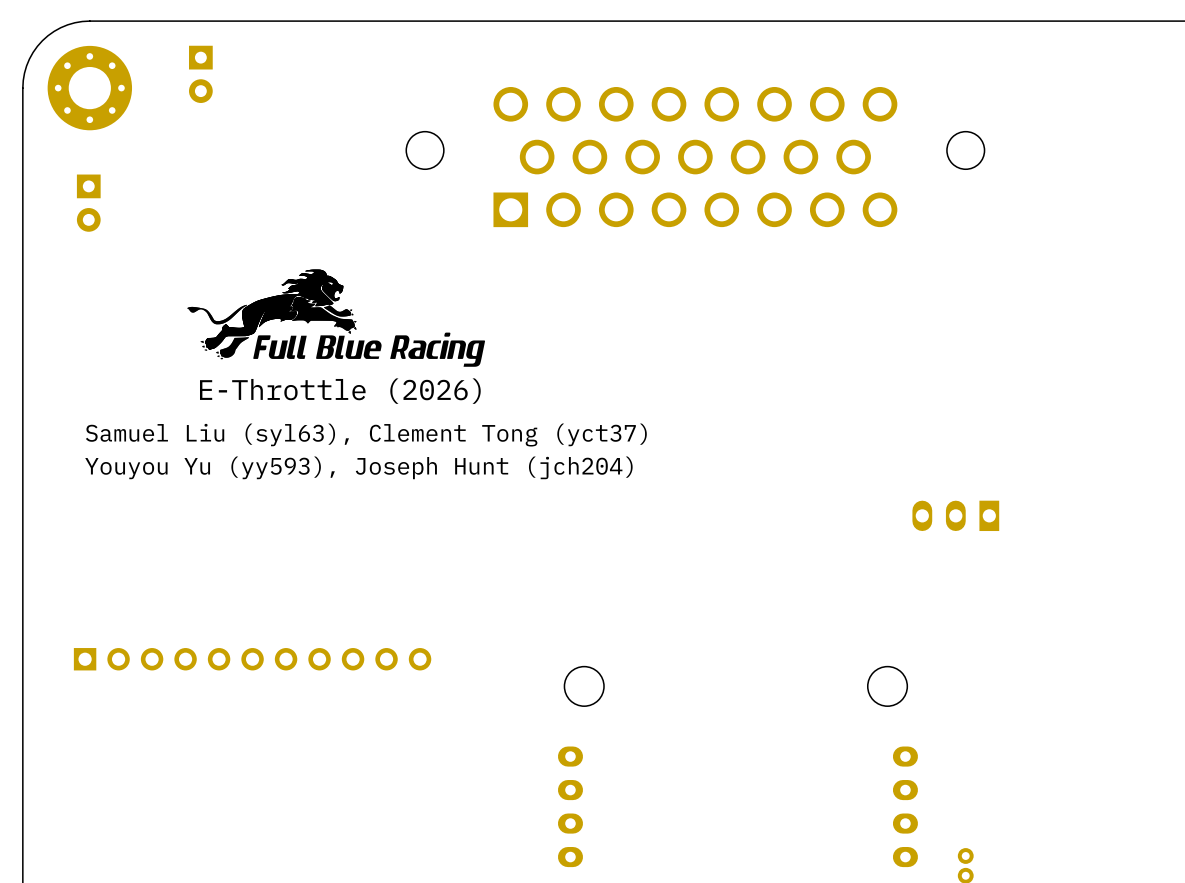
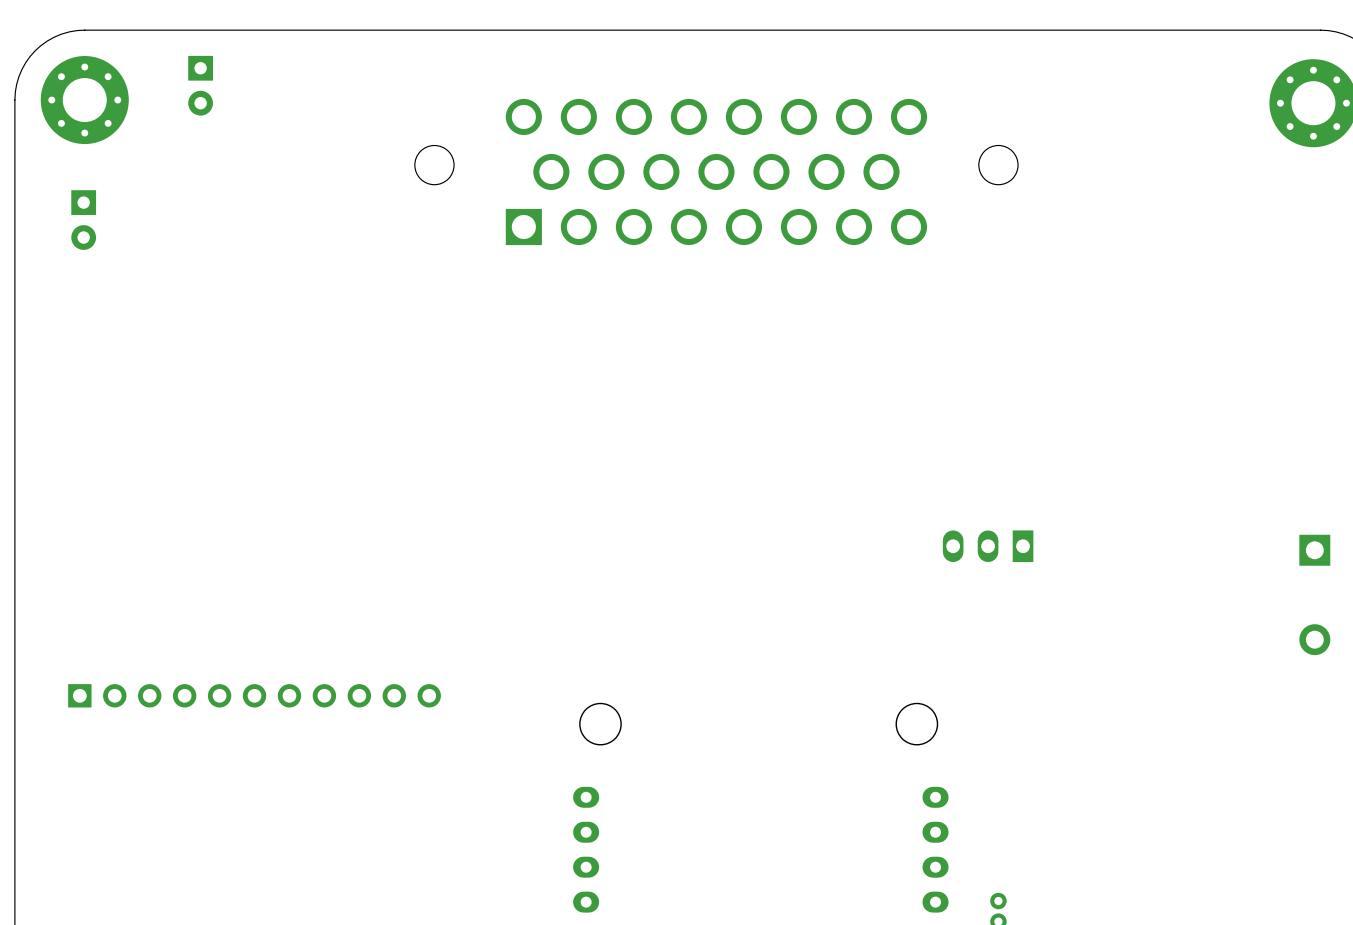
E-Throttle (2026): (336, 318) -> none

